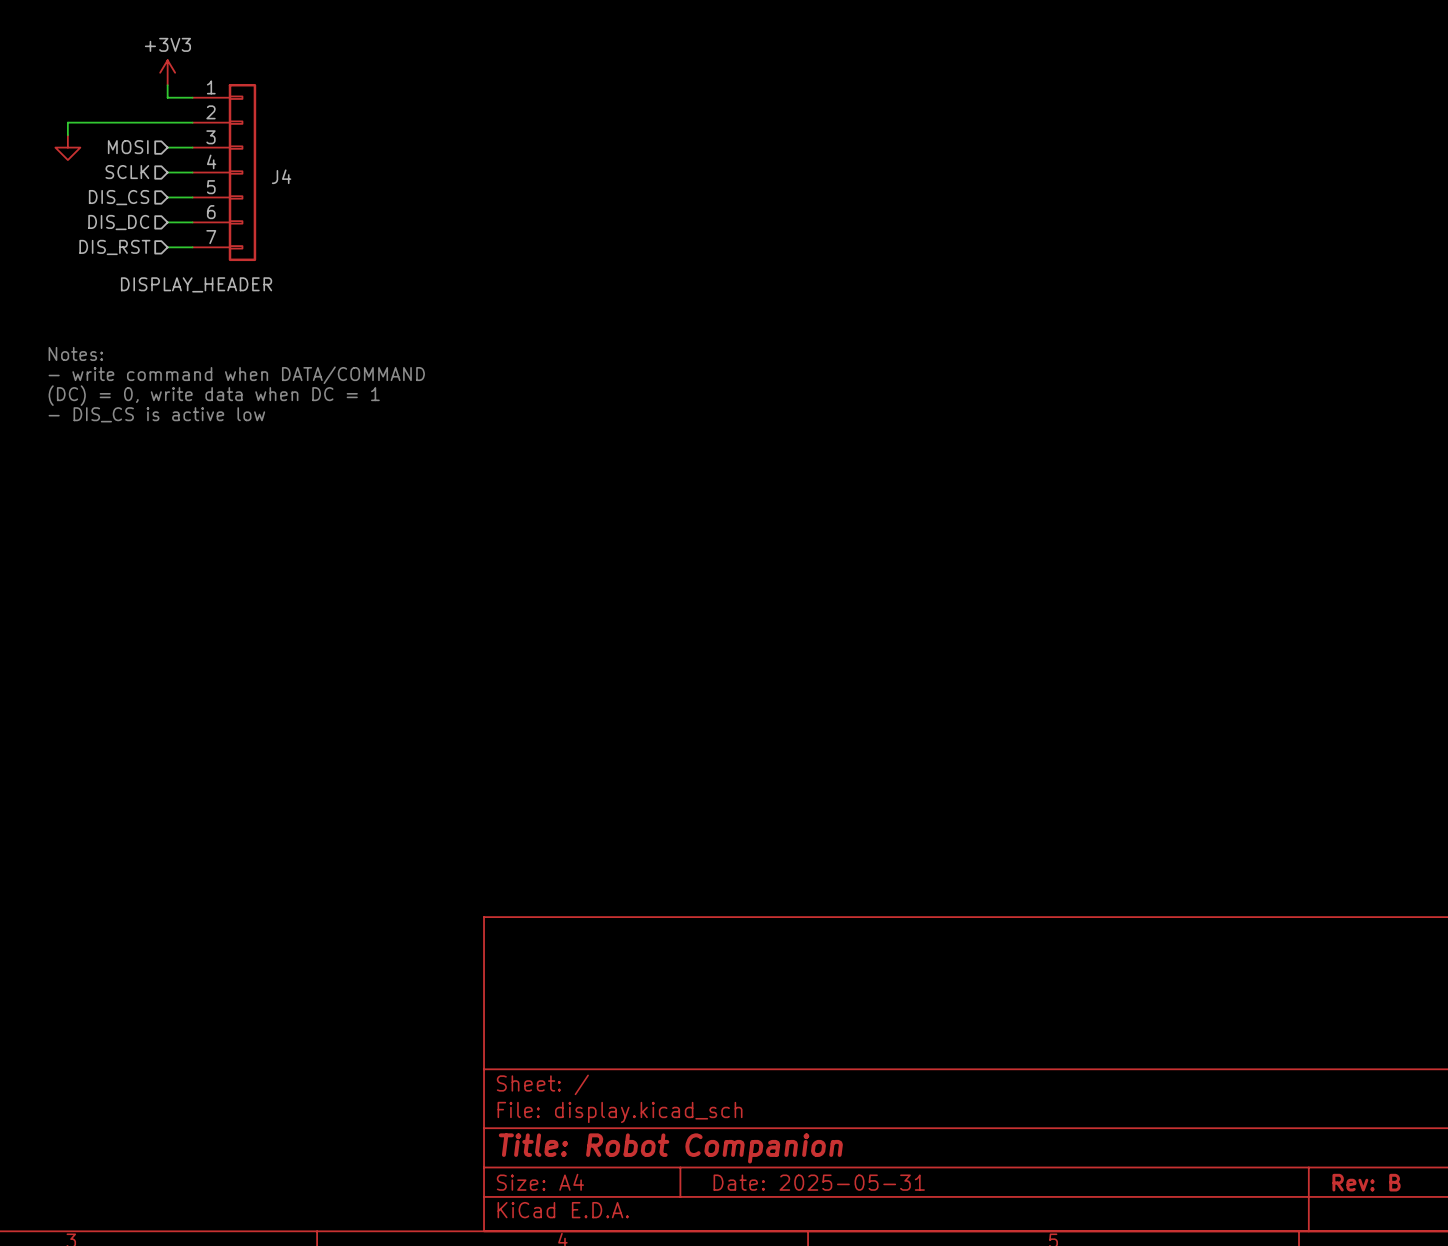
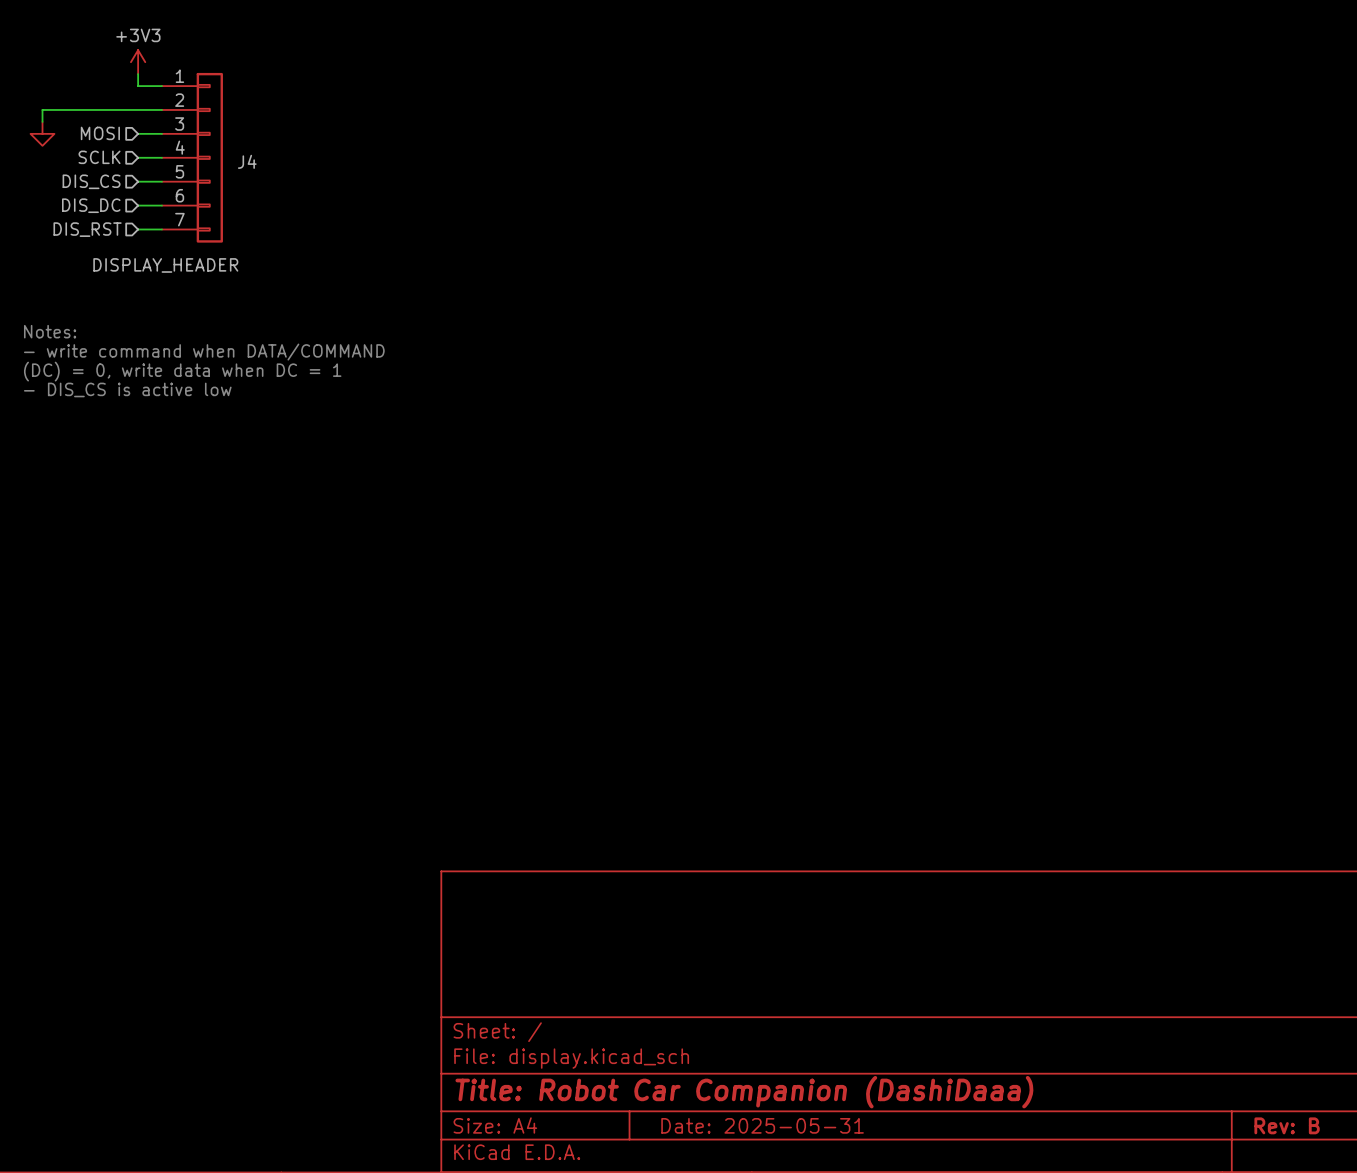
title block: Title: Robot Companion (670, 1148) -> Title: Robot Car Companion (DashiDaaa) (744, 1092)

